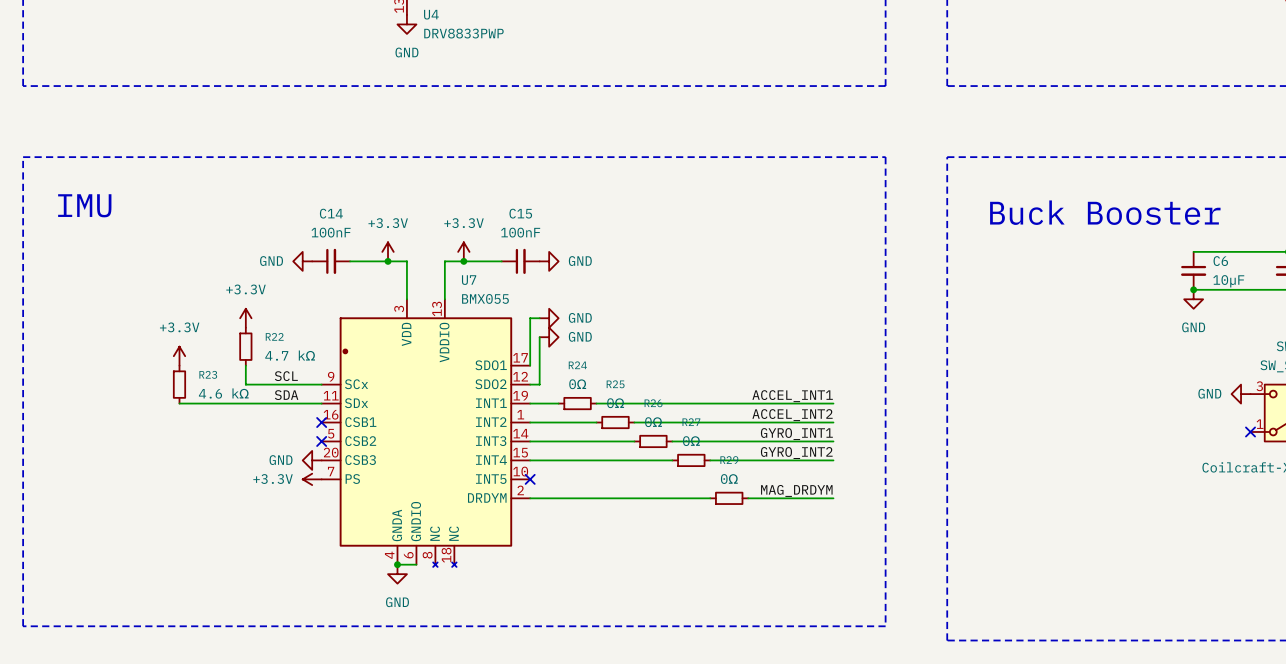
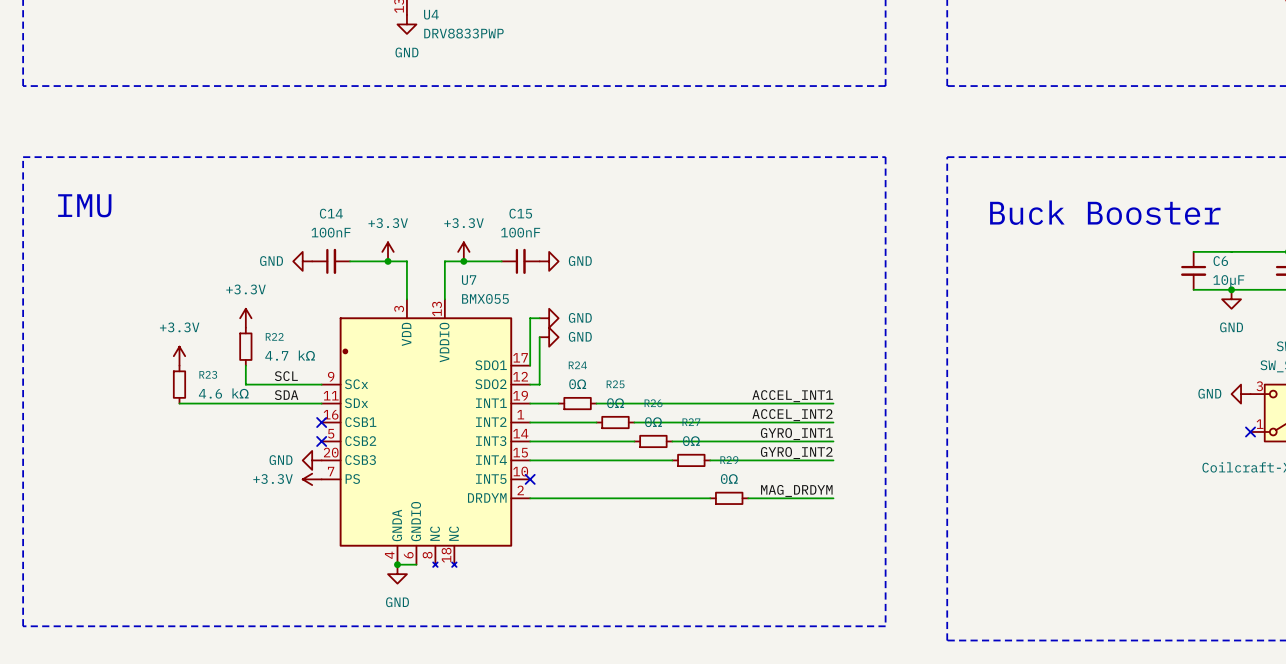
junction position: (1193, 289) -> (1231, 289)
power symbol position: GND (1193, 299) -> GND (1231, 299)

